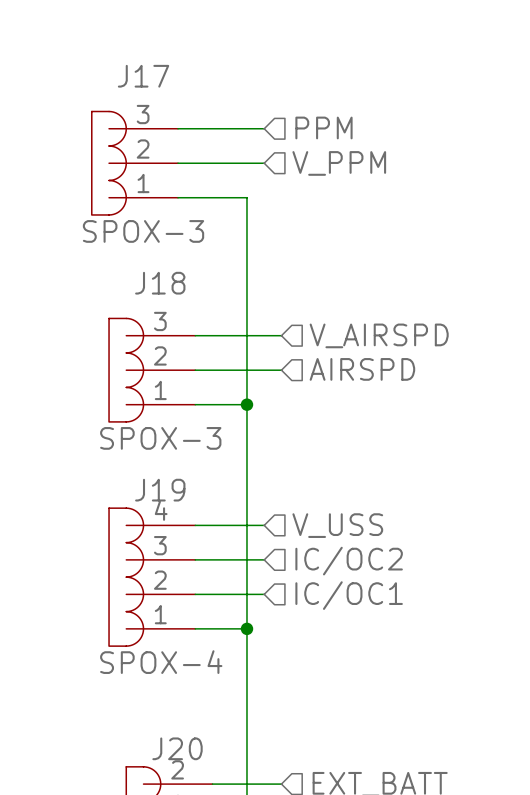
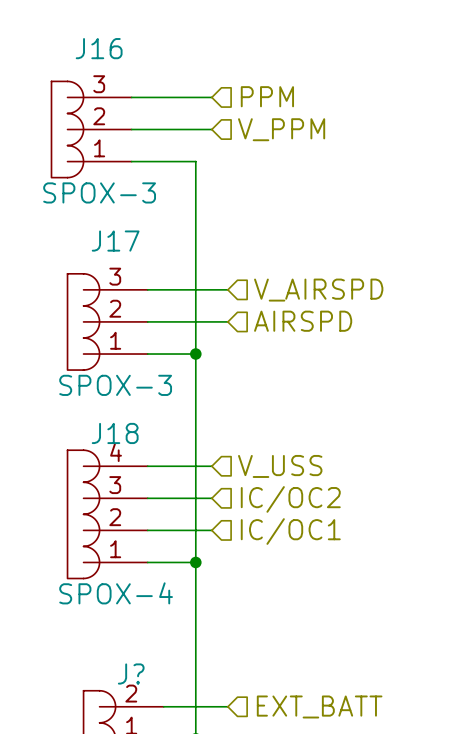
J17 name: J17 (143, 76) -> J16 (99, 48)
J18 name: J18 (160, 283) -> J17 (115, 241)
J19 name: J19 (160, 490) -> J18 (115, 433)
J20 name: J20 (177, 748) -> J? (131, 673)

